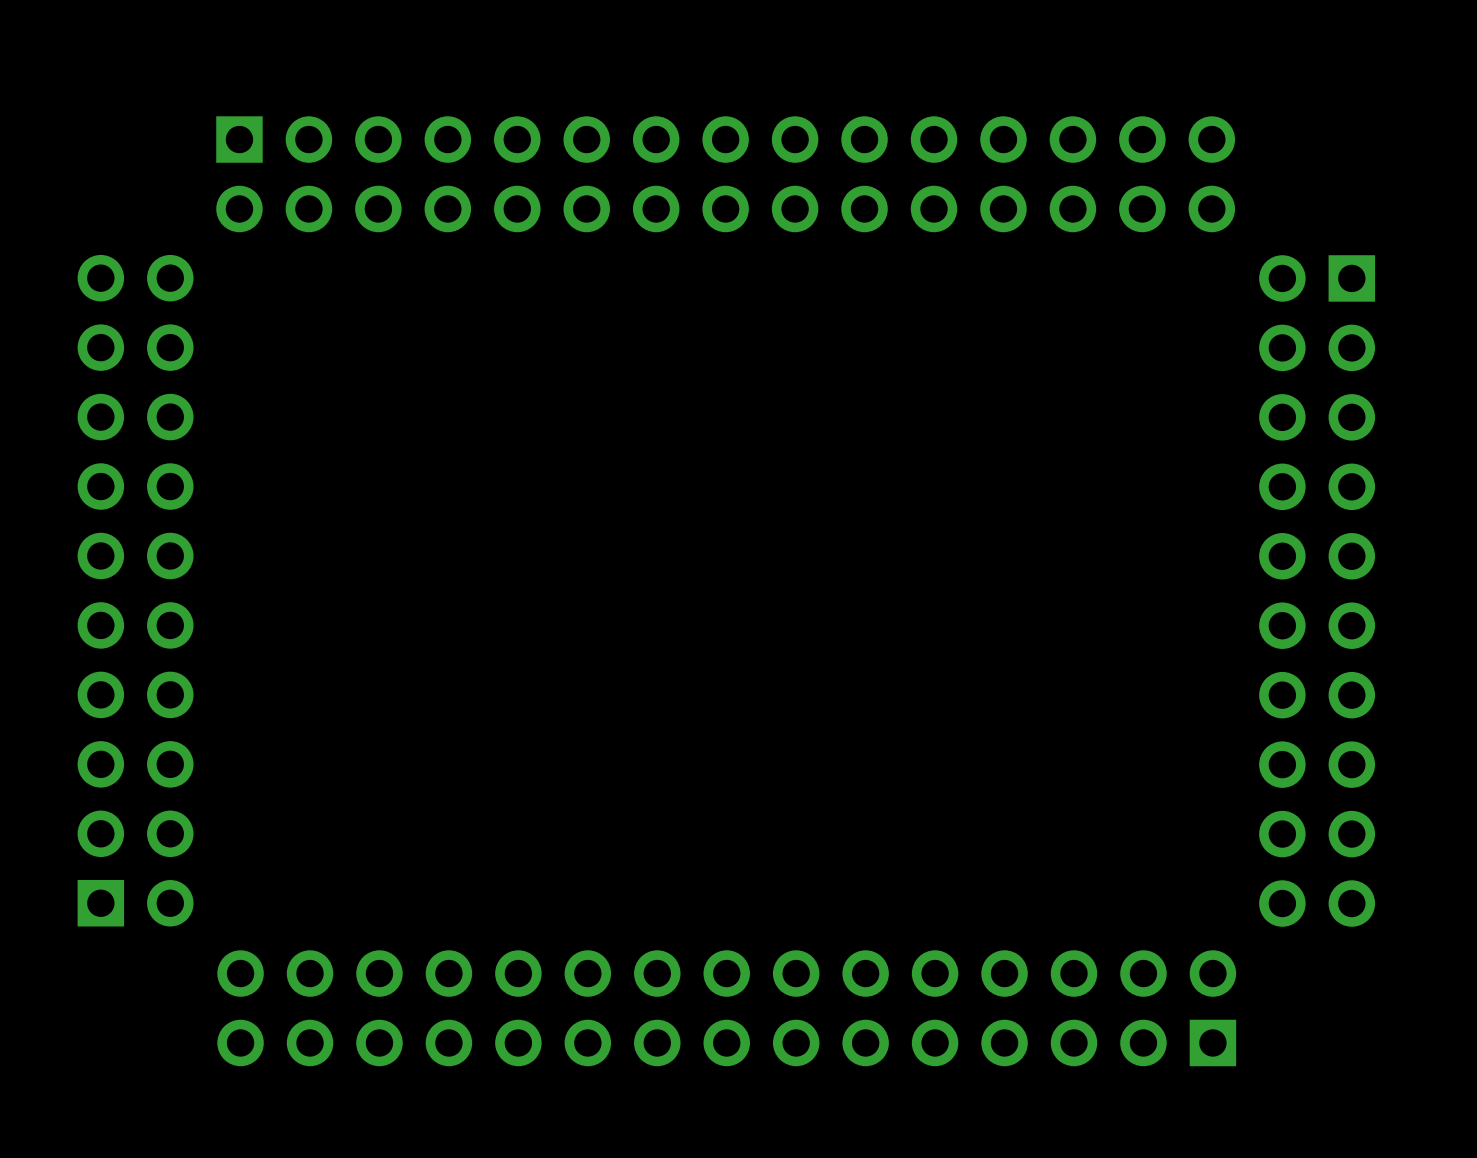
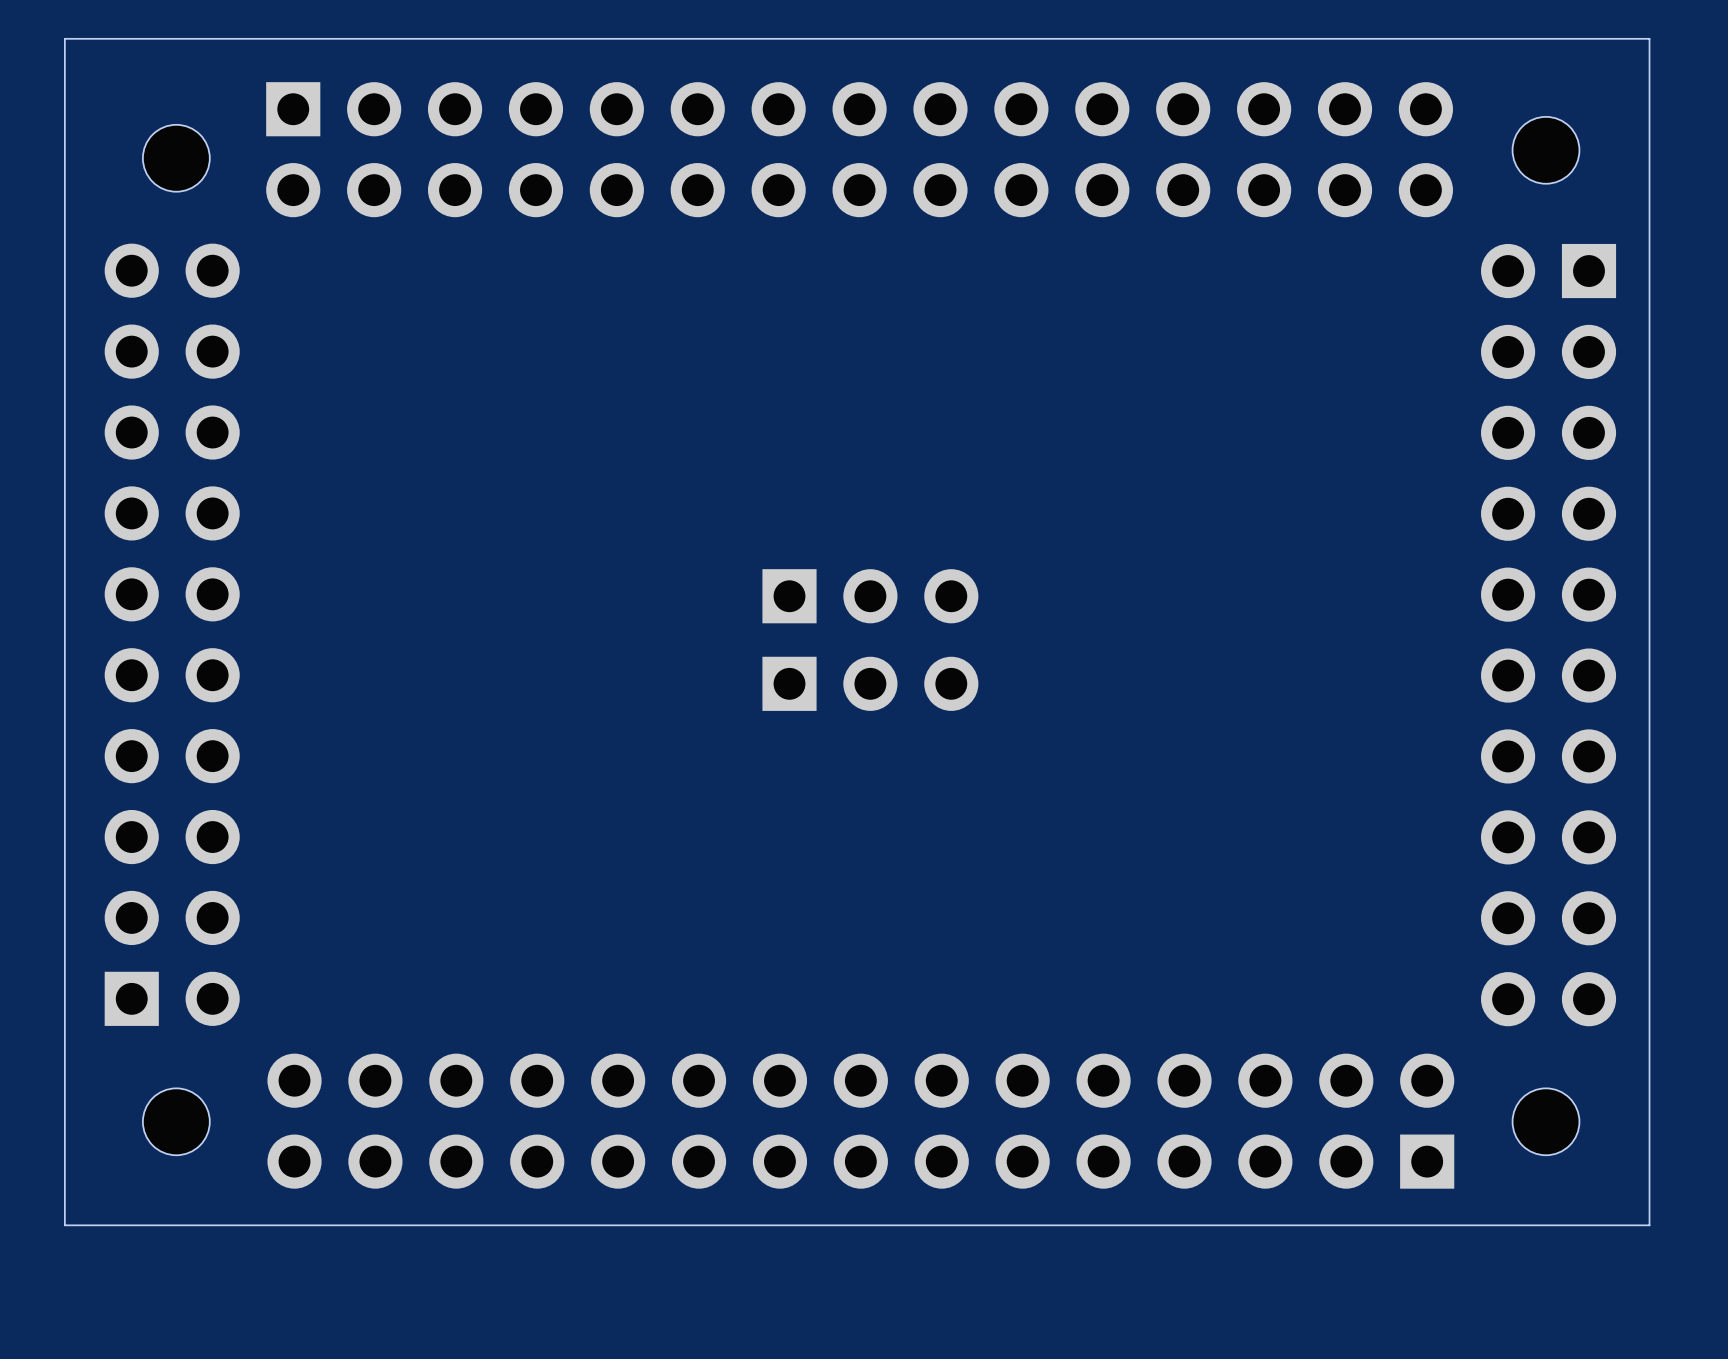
board edge: none -> (1649, 38) (64, 38) (64, 1225) (1649, 1225) (1649, 38)
part: none -> (1545, 150)
part: none -> (176, 158)
part: none -> (870, 596)
part: none -> (870, 683)
part: none -> (176, 1121)
part: none -> (1545, 1121)

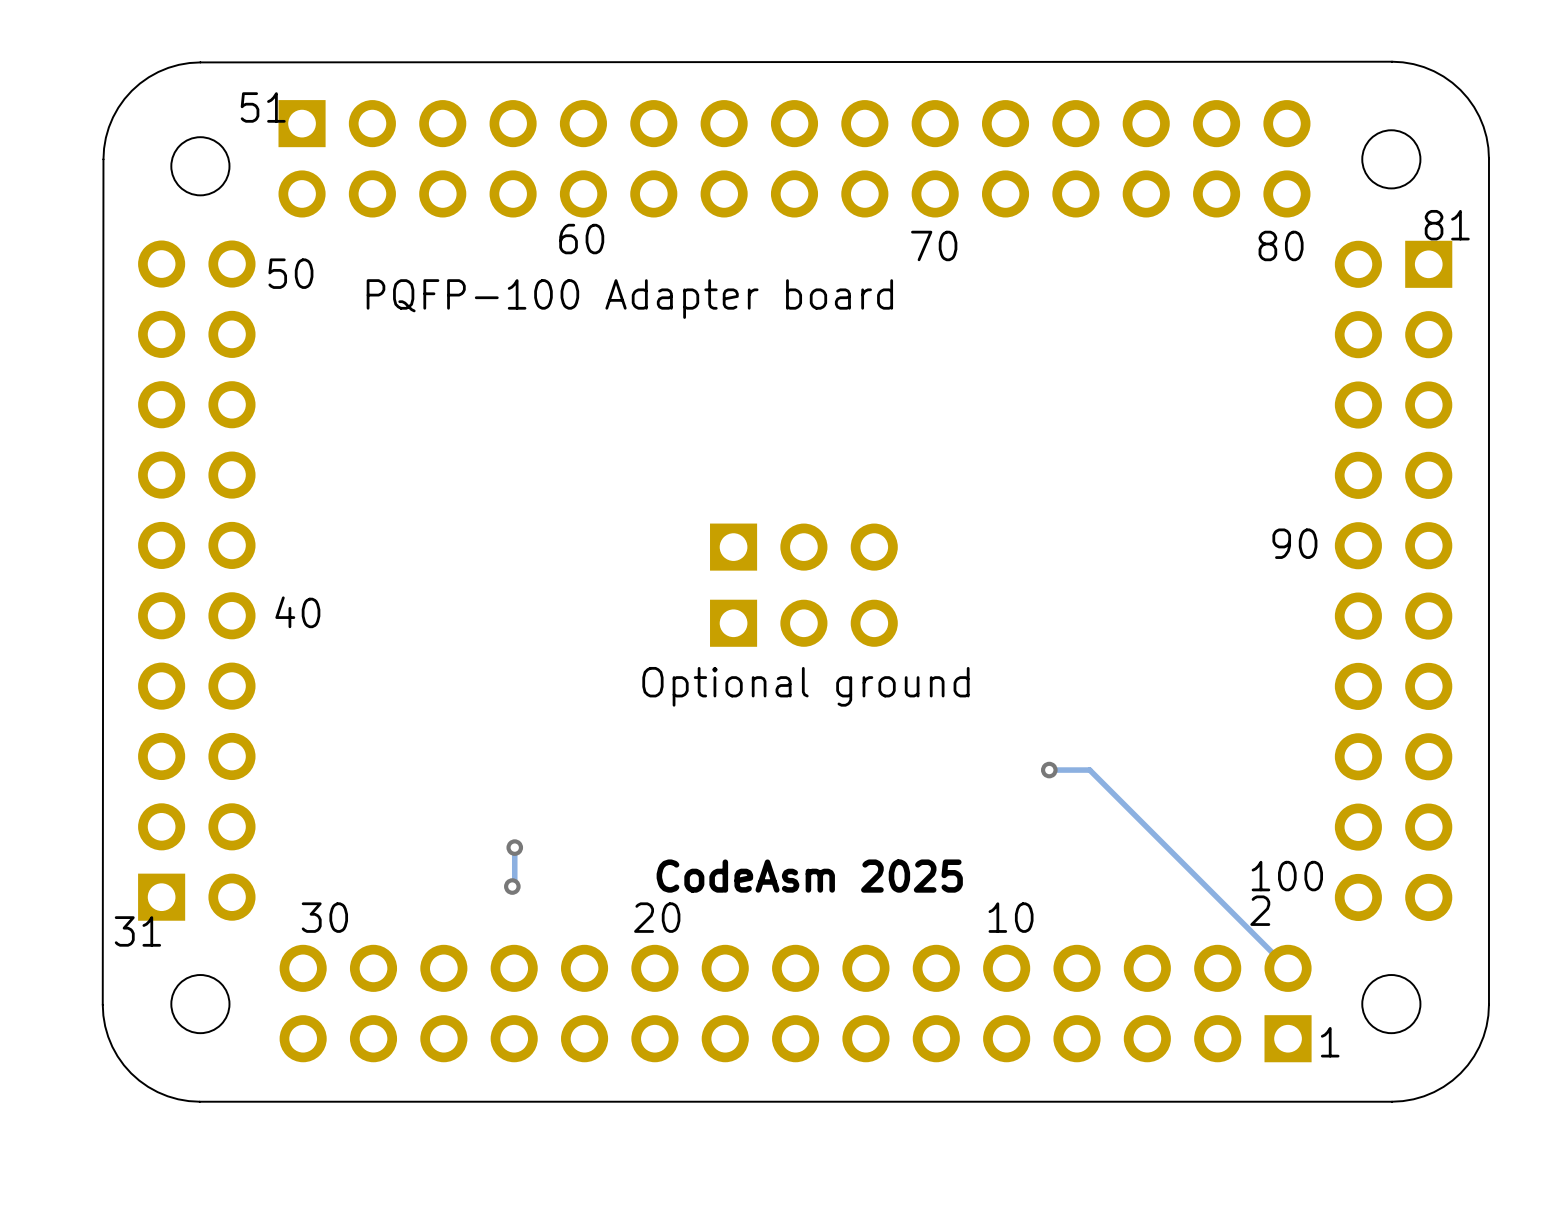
board edge: (1649, 38) (64, 38) (64, 1225) (1649, 1225) (1649, 38) -> (1392, 61) (1413, 64) (1434, 71) (1460, 90) (1479, 116) (1488, 147) (1488, 1004) (1486, 1026) (1479, 1046) (1467, 1065) (1452, 1080) (1424, 1096) (1392, 1101) (199, 1101) (178, 1099) (157, 1092) (139, 1080) (123, 1065) (108, 1036) (102, 1004) (103, 159) (105, 137) (113, 117) (124, 98) (139, 83) (168, 67) (200, 62) (1392, 61)
text: none -> 51 (263, 107)
text: none -> 81 (1447, 225)
text: none -> 60 (581, 239)
text: none -> 70 (934, 245)
text: none -> 80 (1281, 245)
text: none -> 50 (290, 273)
text: none -> PQFP-100 Adapter board (629, 299)
text: none -> 90 (1294, 543)
text: none -> 40 (297, 612)
text: none -> Optional ground (805, 686)
track: none -> (1049, 770) (1089, 770) (1288, 968)
via: none -> (1049, 770)
track: none -> (514, 847) (514, 888) (512, 886)
via: none -> (514, 847)
text: none -> CodeAsm 2025 (809, 876)
text: none -> 100 (1287, 876)
via: none -> (512, 886)
text: none -> 2 (1260, 910)
text: none -> 30 (324, 917)
text: none -> 20 (657, 917)
text: none -> 10 (1011, 917)
text: none -> 31 (137, 931)
text: none -> 1 (1330, 1042)

